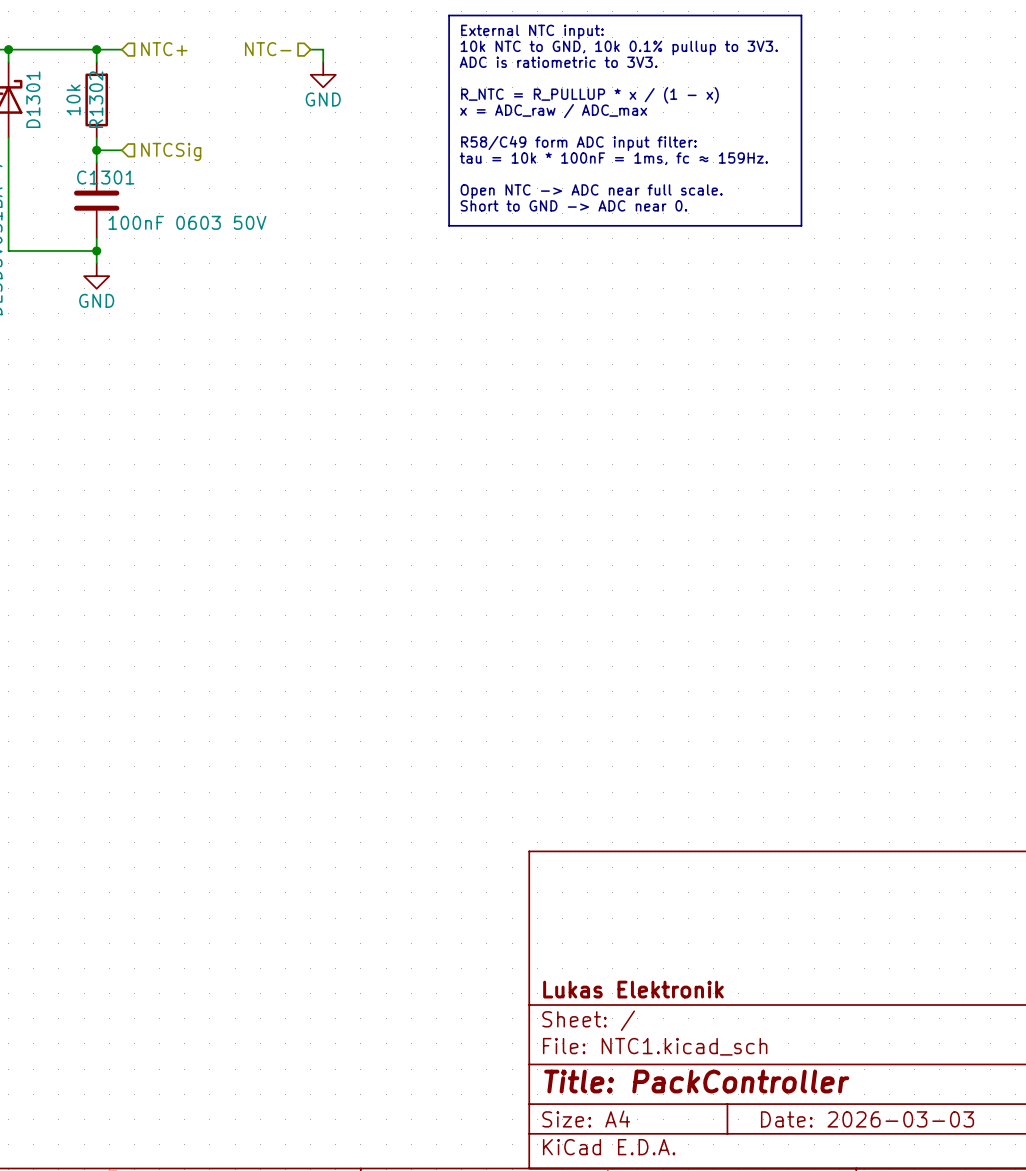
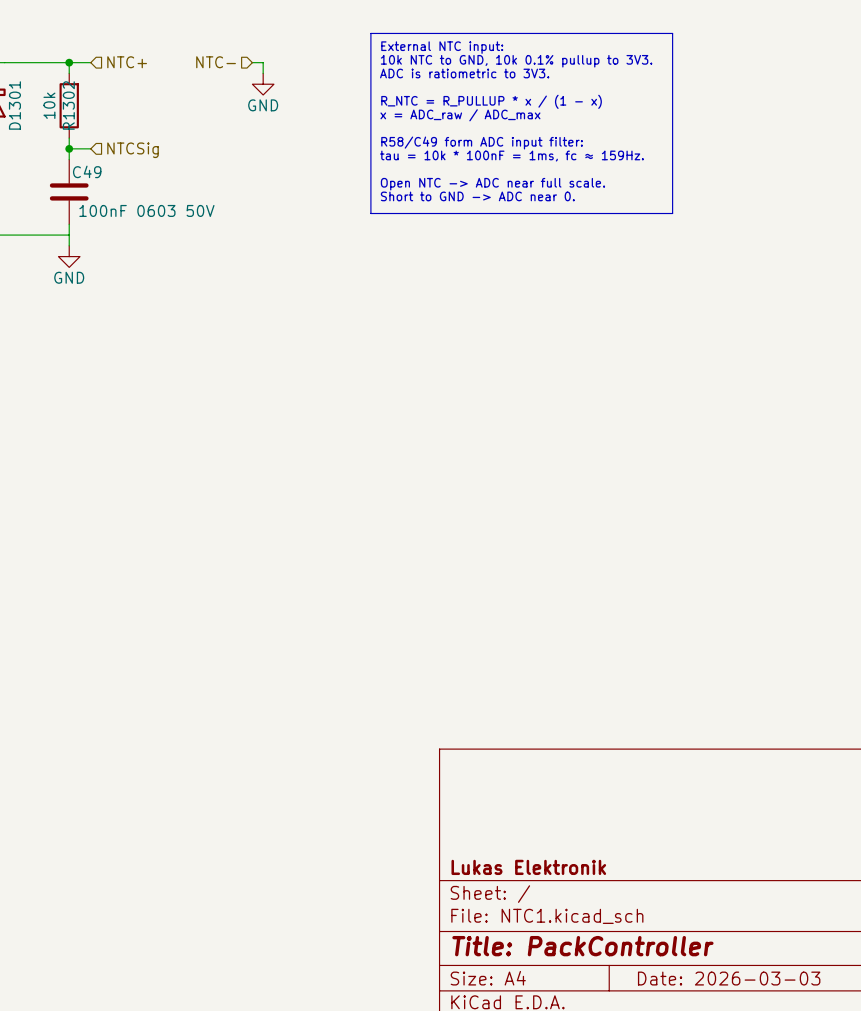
C1301 name: C1301 (105, 177) -> C49 (87, 171)
junction: (96, 250) -> none

